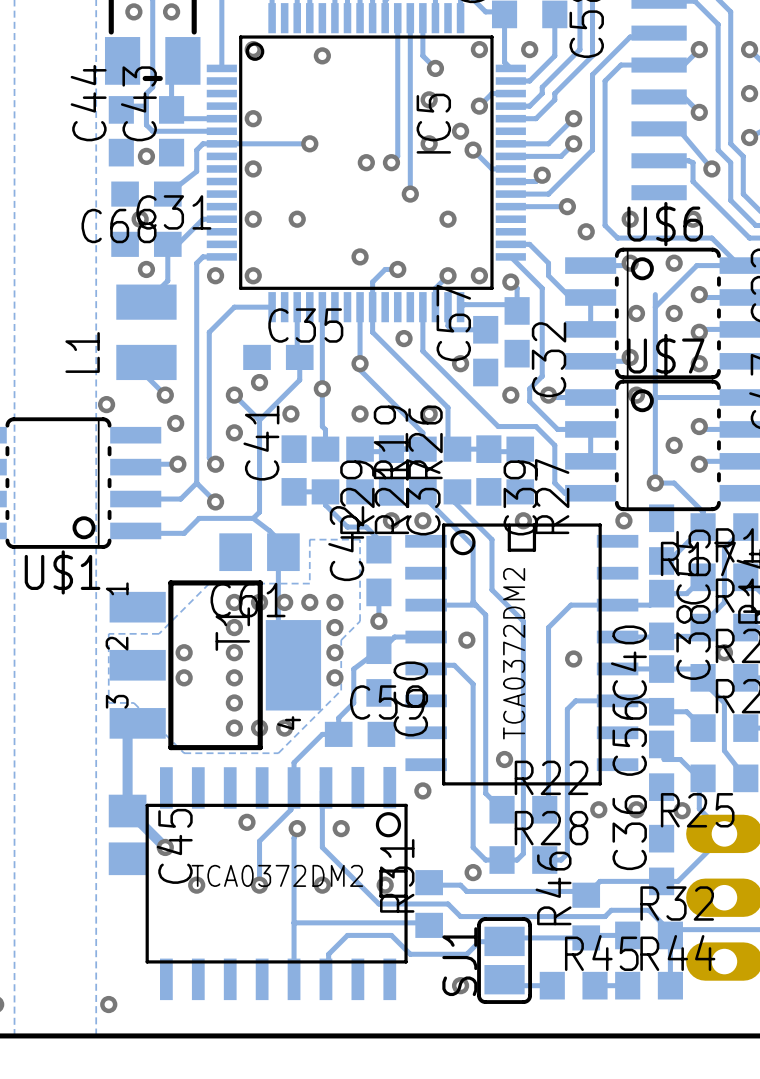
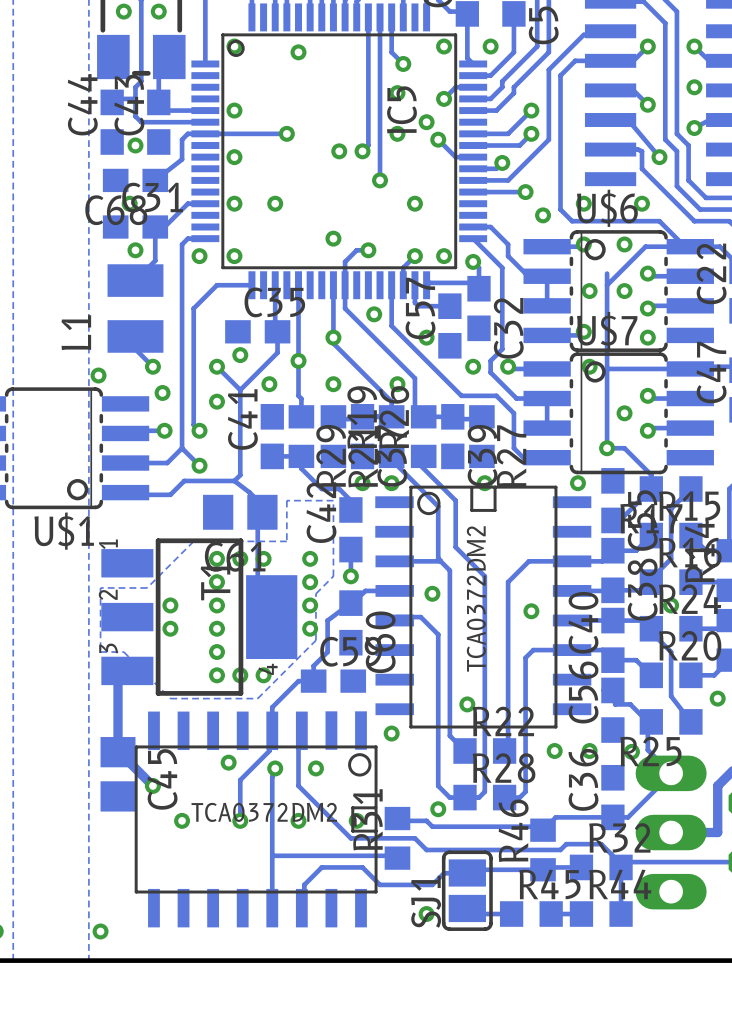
via: (309, 602) -> none

